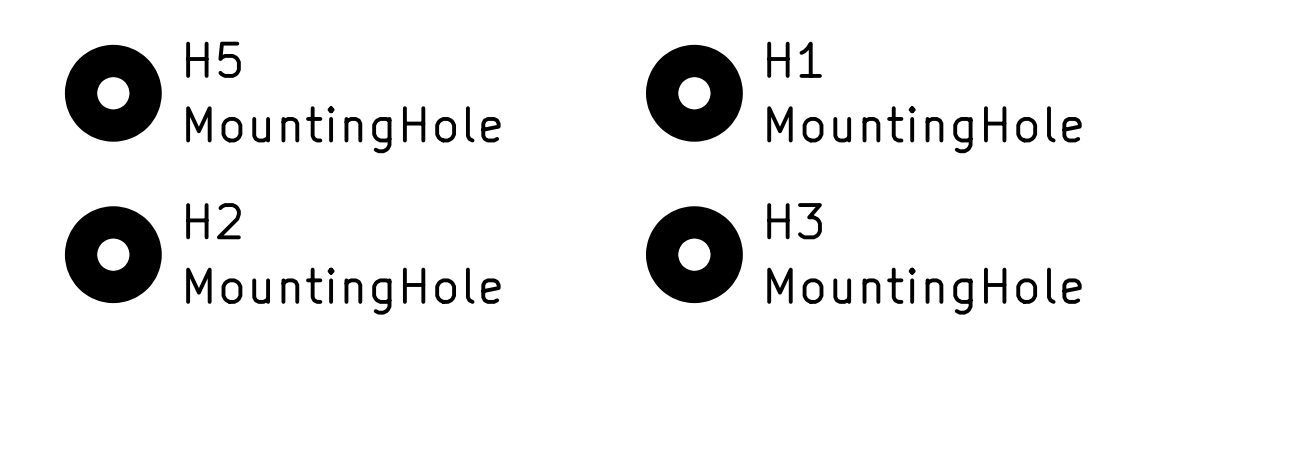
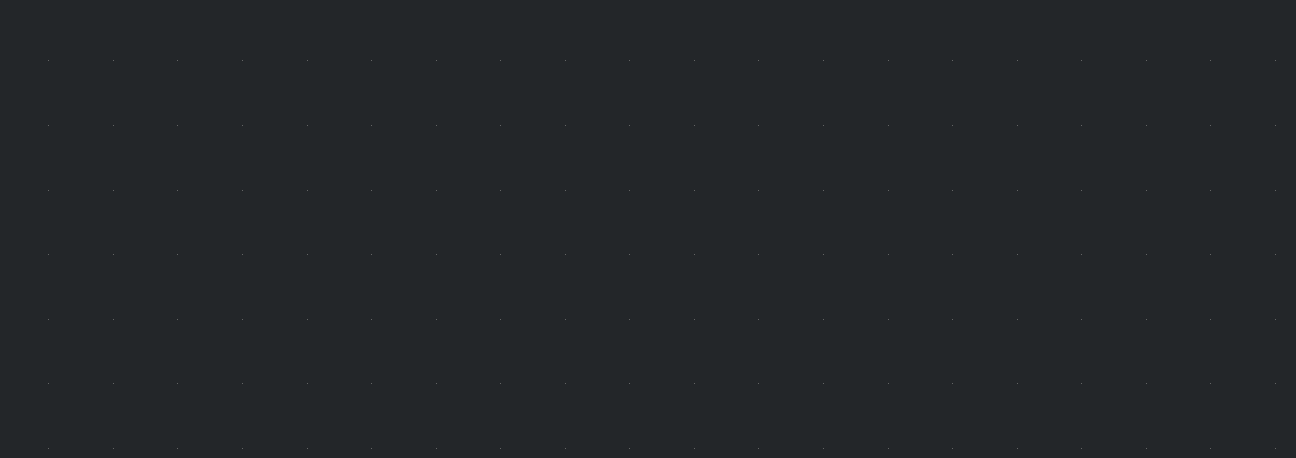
H5: MountingHole (113, 93) -> none
H1: MountingHole (694, 93) -> none
H2: MountingHole (113, 254) -> none
H3: MountingHole (694, 254) -> none

